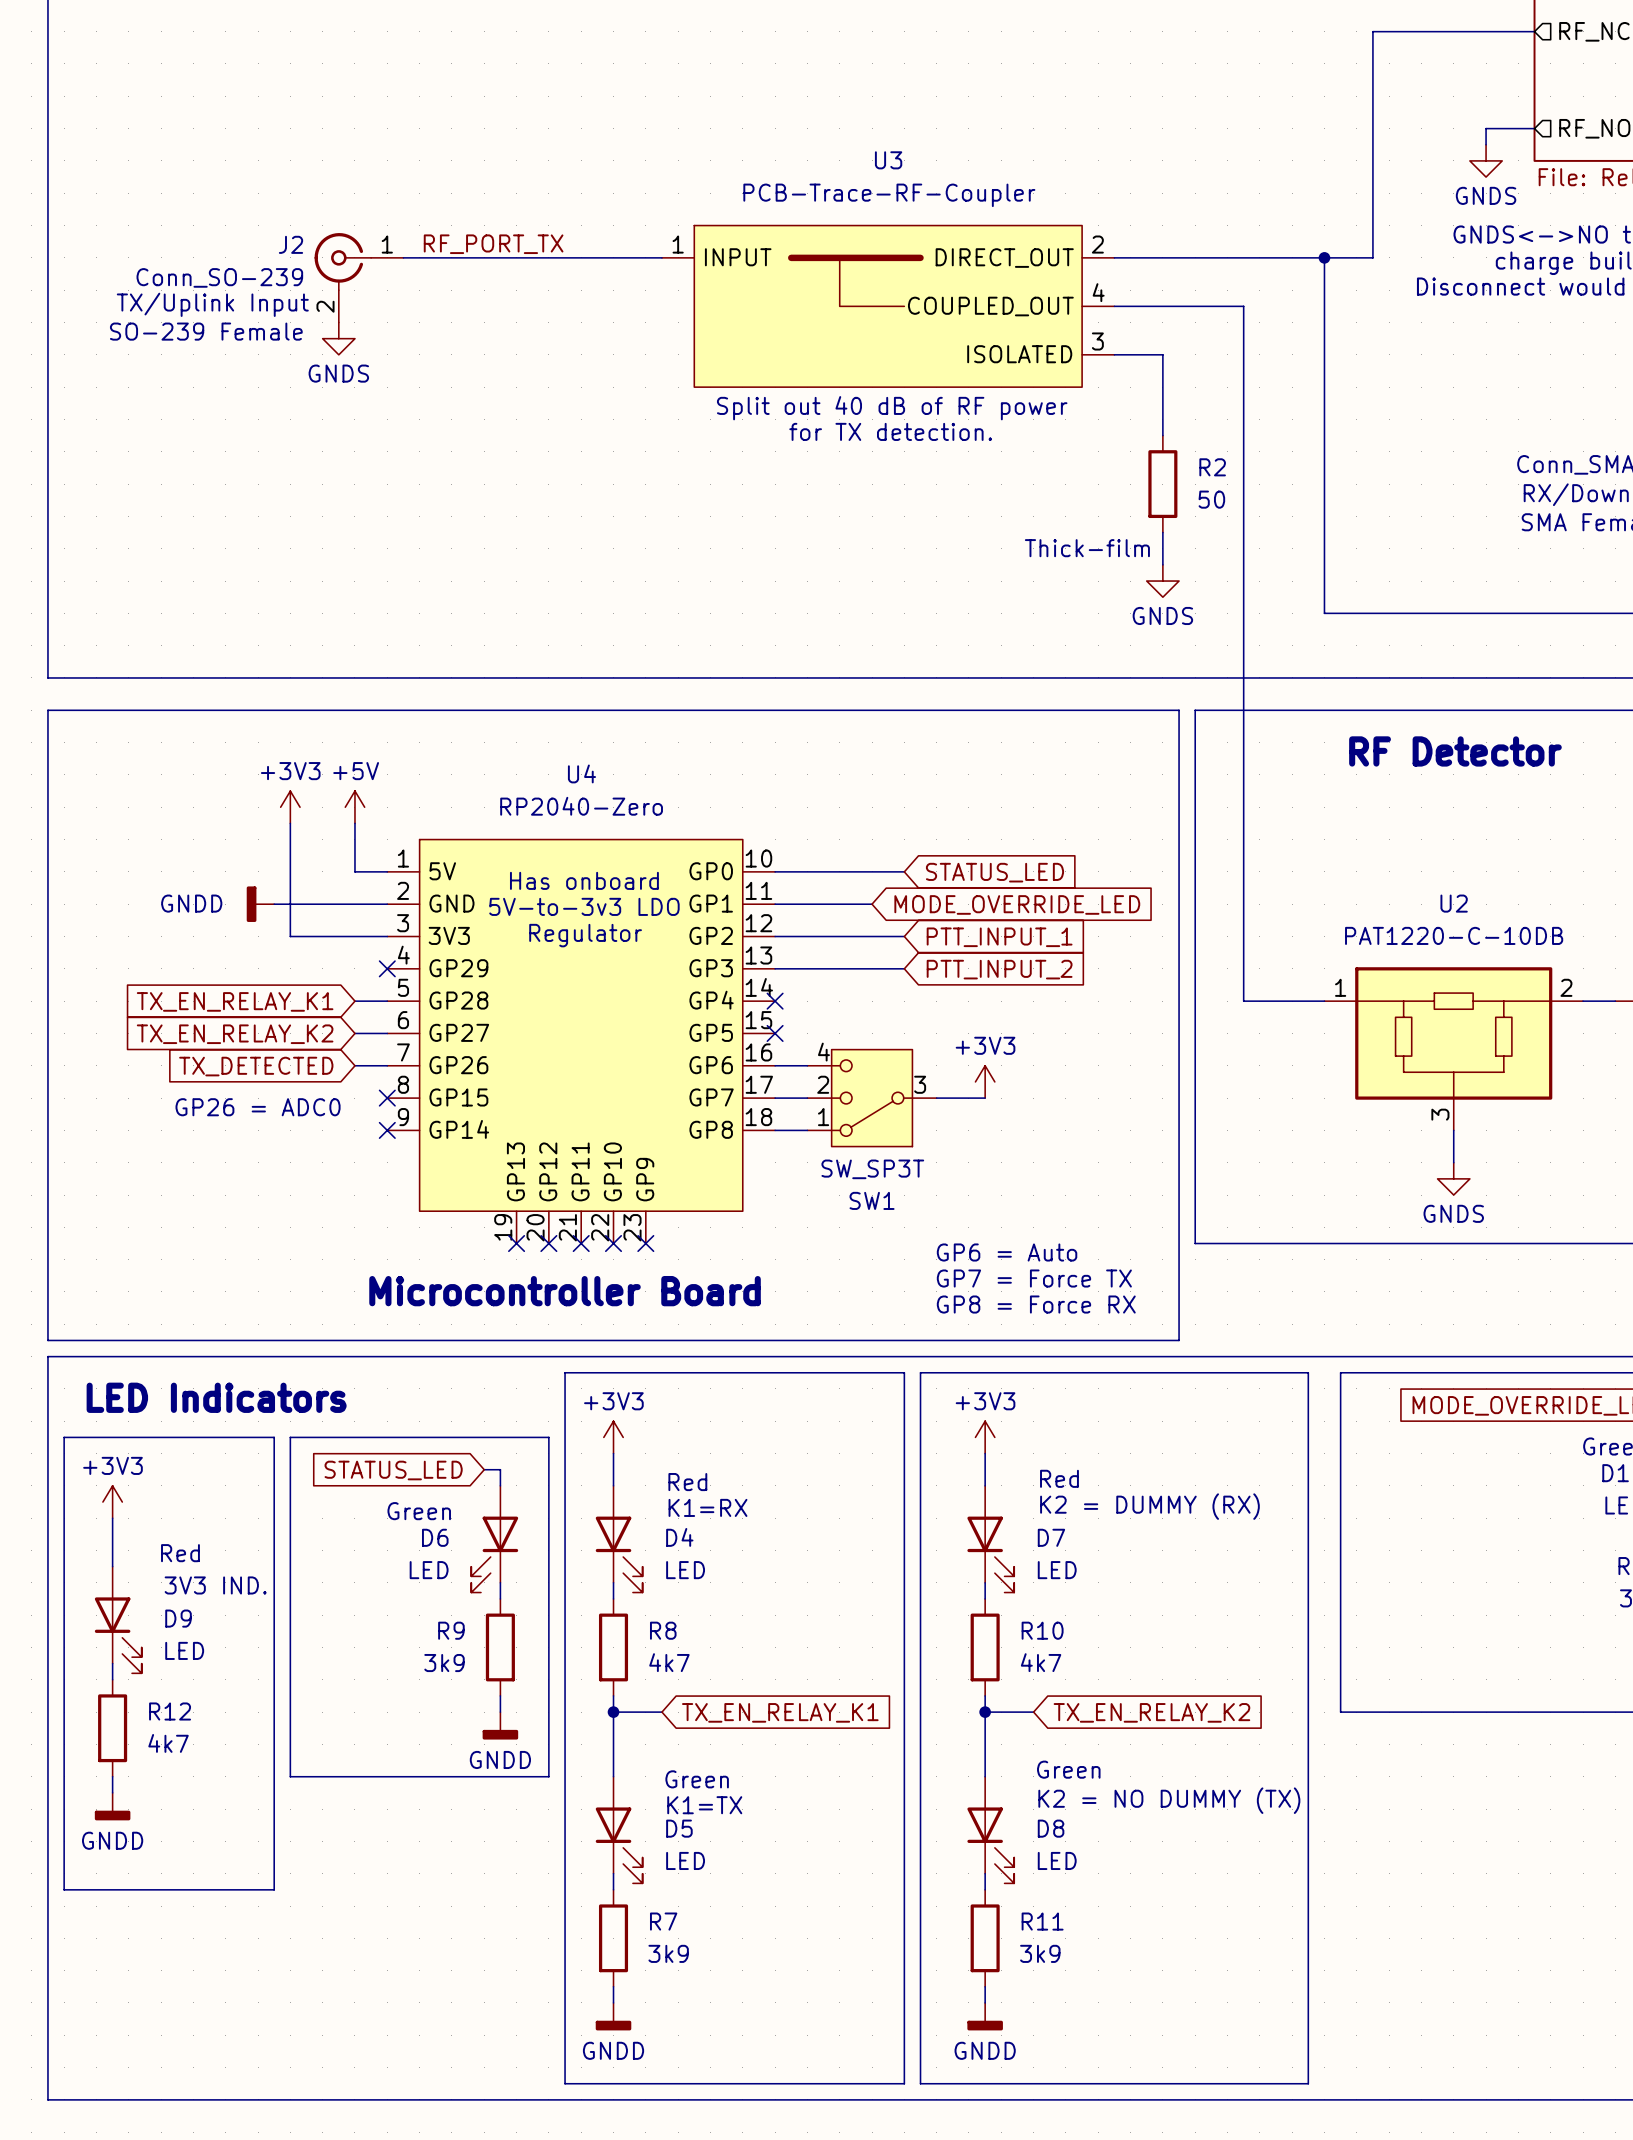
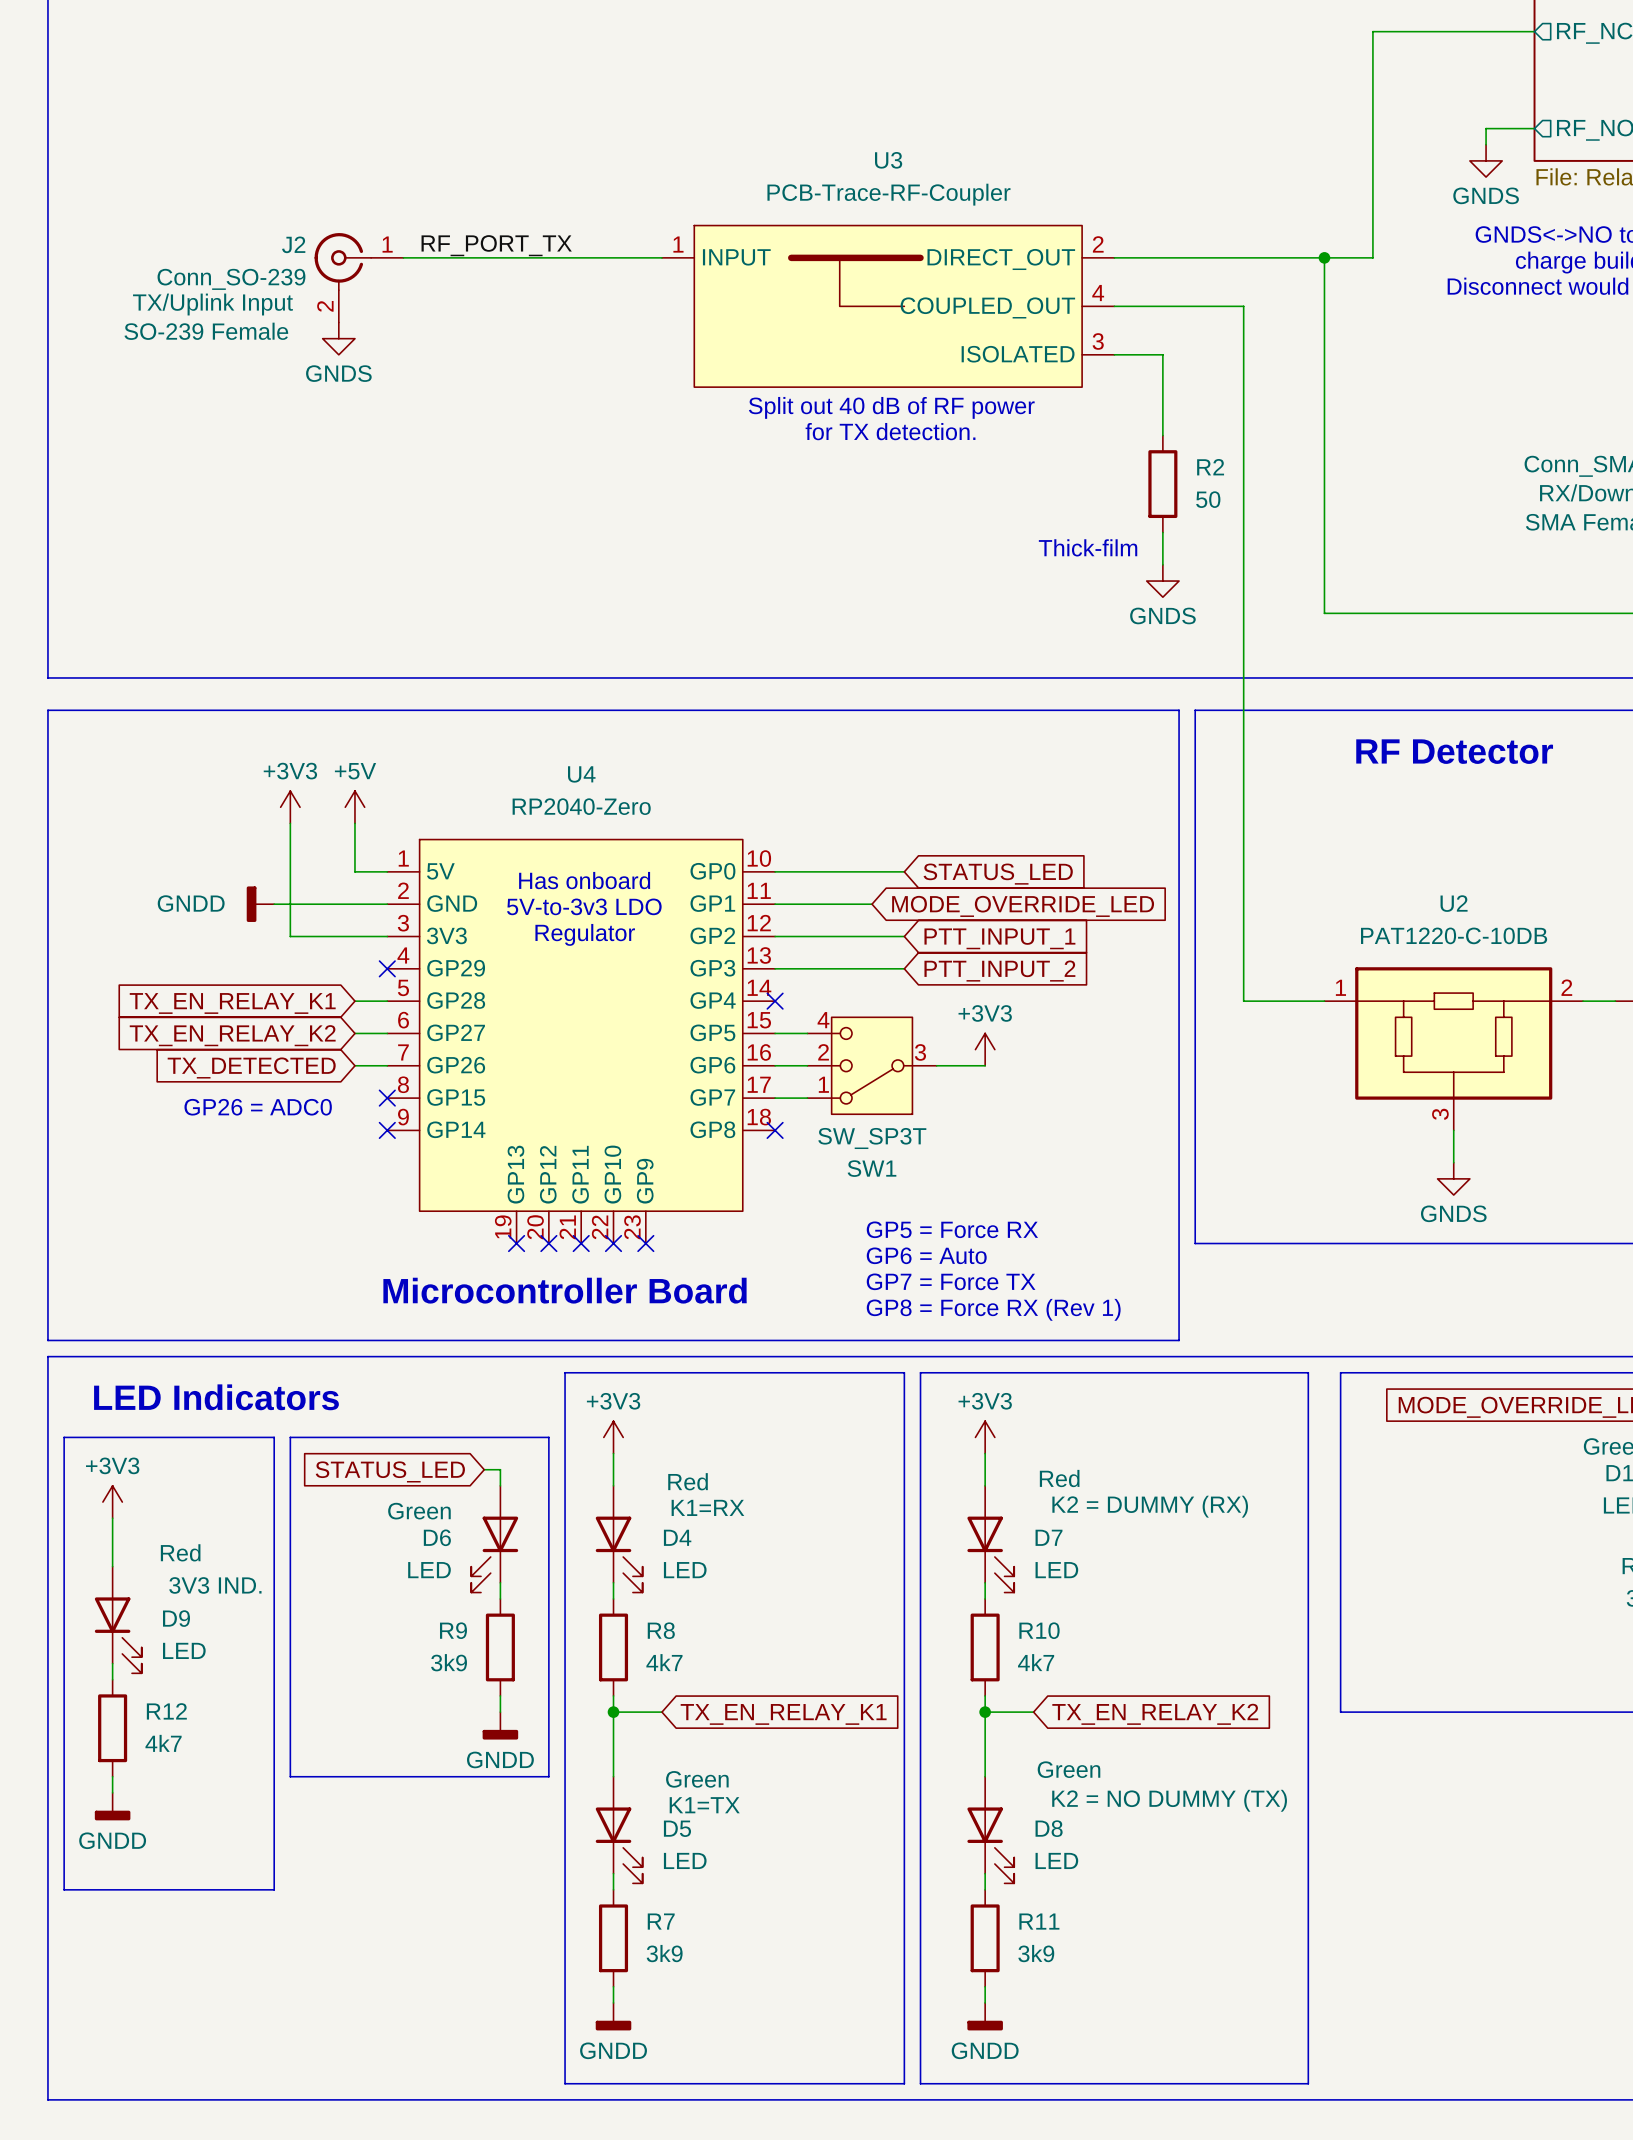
no-connect mark: (775, 1033) -> none
power symbol position: +3V3 (985, 1081) -> +3V3 (985, 1049)
SW1 position: (872, 1098) -> (872, 1065)
wire: (936, 1098) (985, 1098) -> (936, 1065) (985, 1065)
wire: (775, 1130) (807, 1130) -> (775, 1033) (807, 1033)
no-connect mark: none -> (775, 1130)
text: none -> GP5 = Force RX (952, 1229)
text position: GP6 = Auto (1007, 1252) -> GP6 = Auto (926, 1255)
text position: GP7 = Force TX (1034, 1278) -> GP7 = Force TX (951, 1281)
text: GP8 = Force RX (1036, 1304) -> GP8 = Force RX (Rev 1) (993, 1309)

